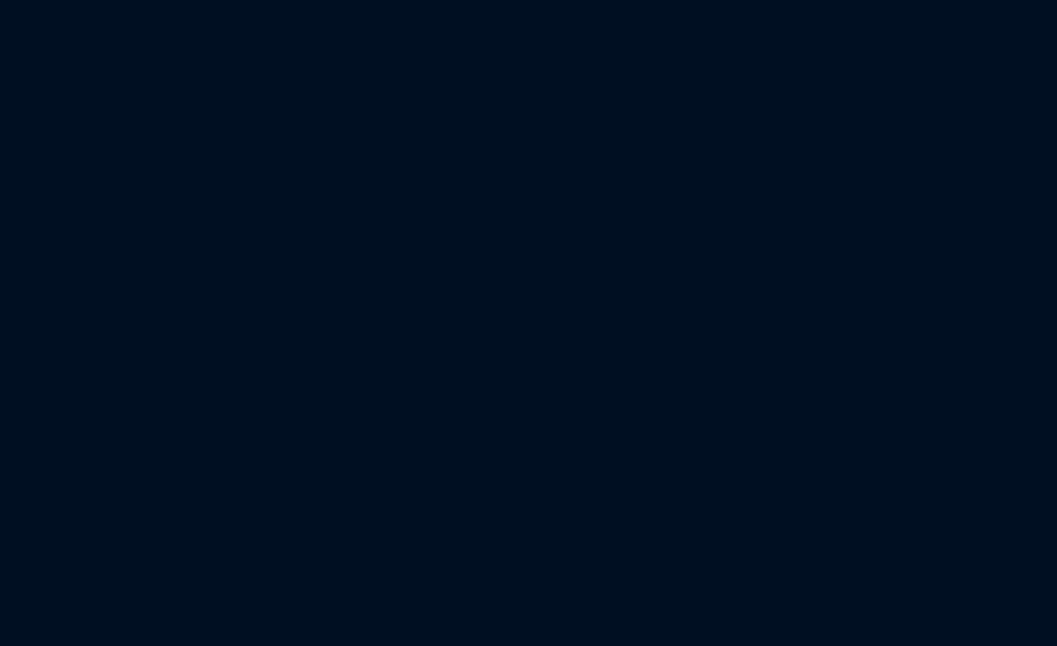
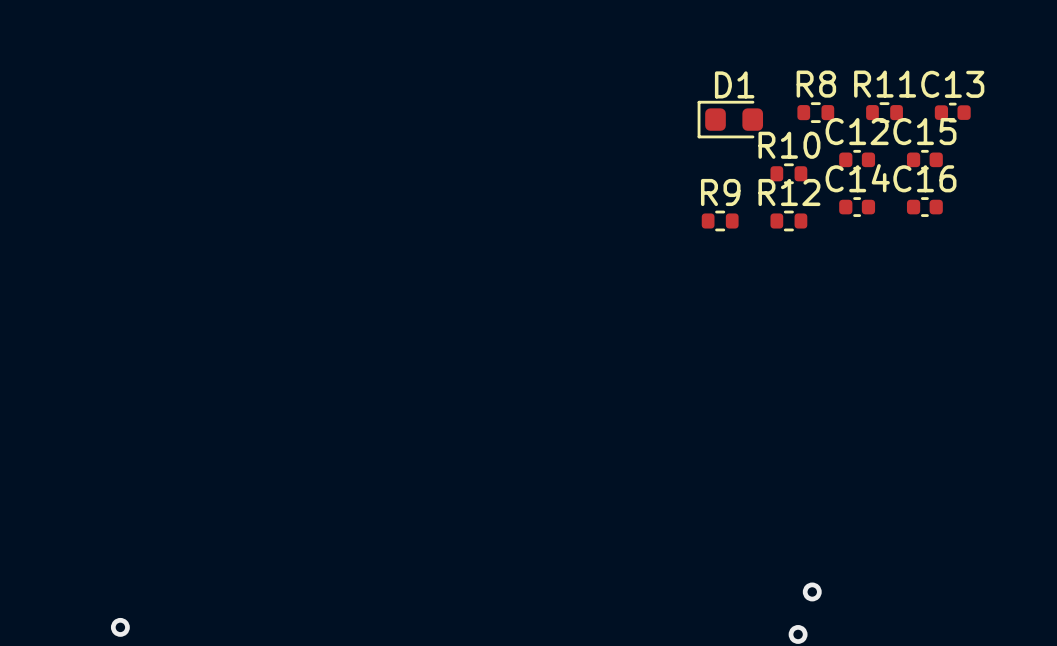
R8: none -> (815, 112)
R11: none -> (884, 112)
C13: none -> (952, 112)
D1: none -> (730, 119)
C12: none -> (857, 159)
C15: none -> (924, 159)
R10: none -> (788, 173)
C14: none -> (857, 207)
C16: none -> (924, 207)
R9: none -> (720, 220)
R12: none -> (788, 220)
via: none -> (812, 591)
via: none -> (120, 627)
via: none -> (798, 634)

